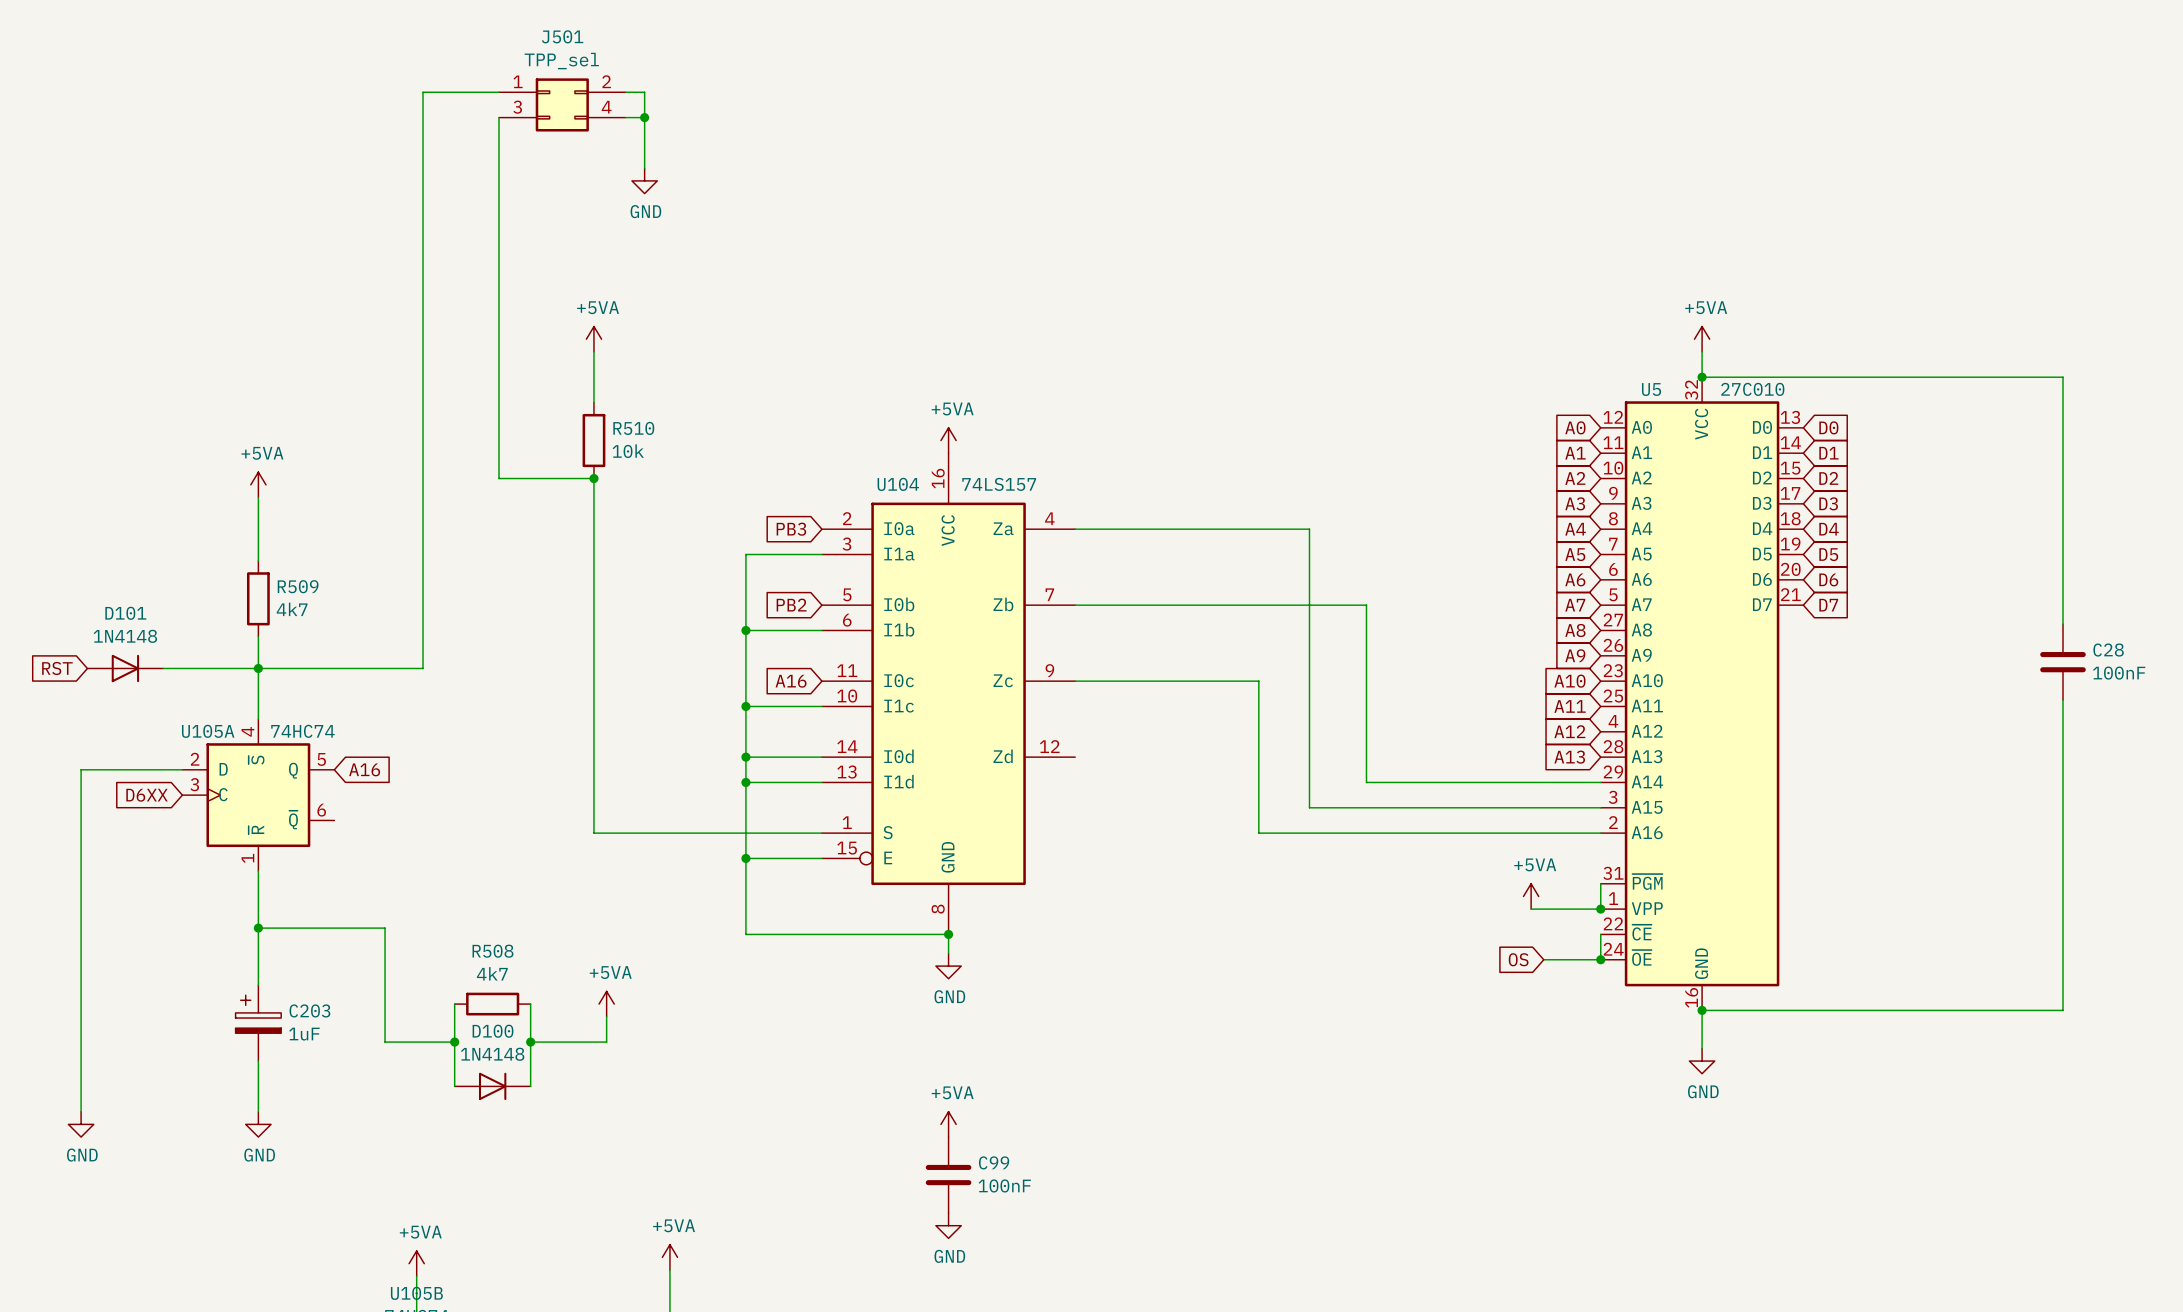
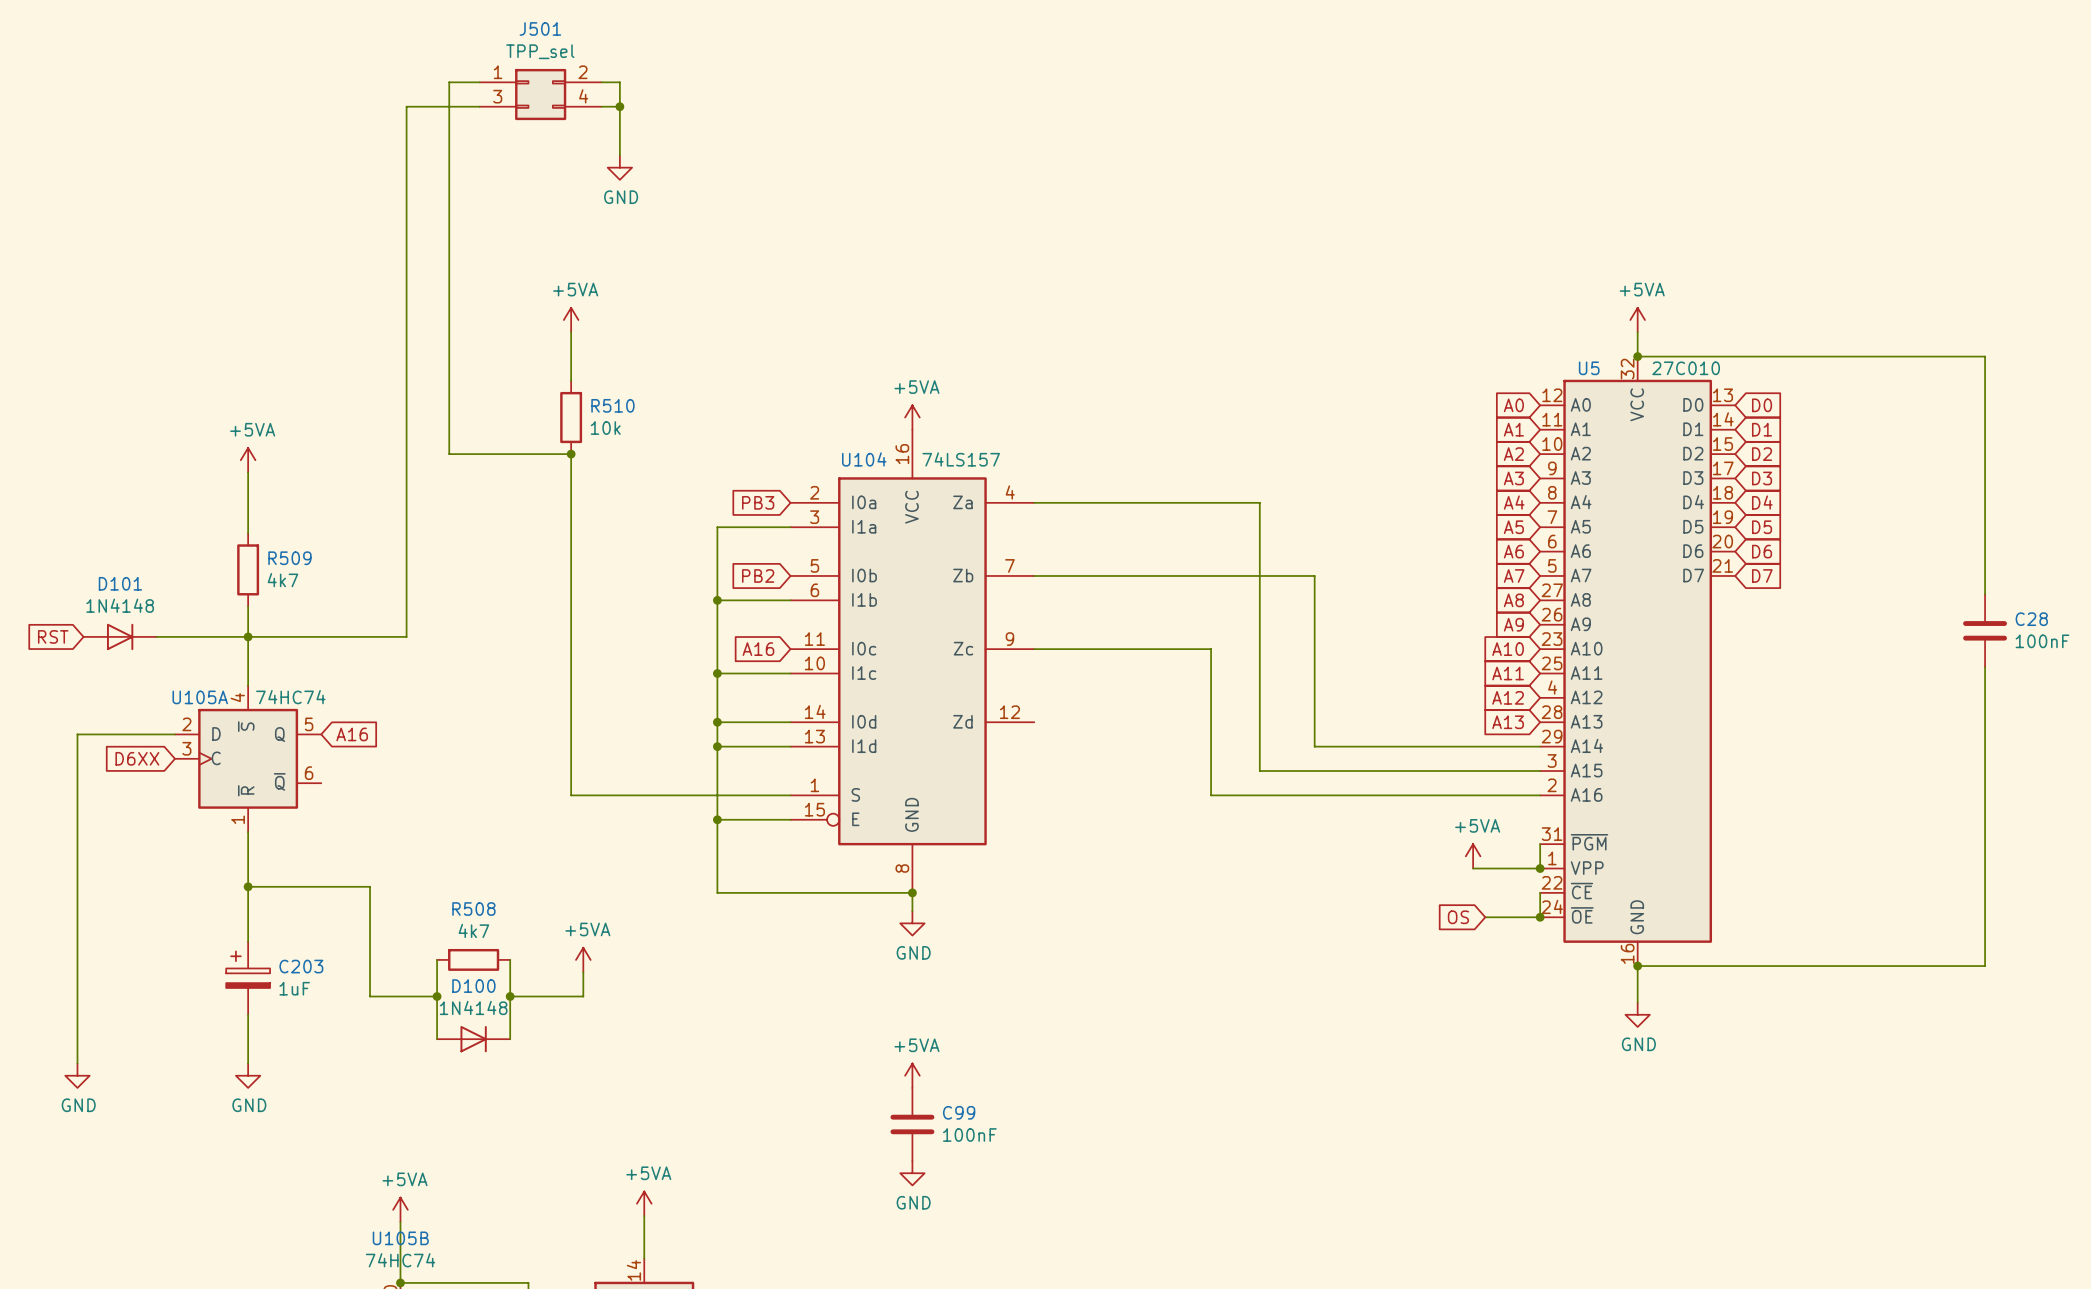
wire: (467, 92) (423, 92) (423, 117) -> (479, 106) (406, 106)
wire: (498, 117) (498, 478) -> (449, 82) (449, 454) (479, 454)

